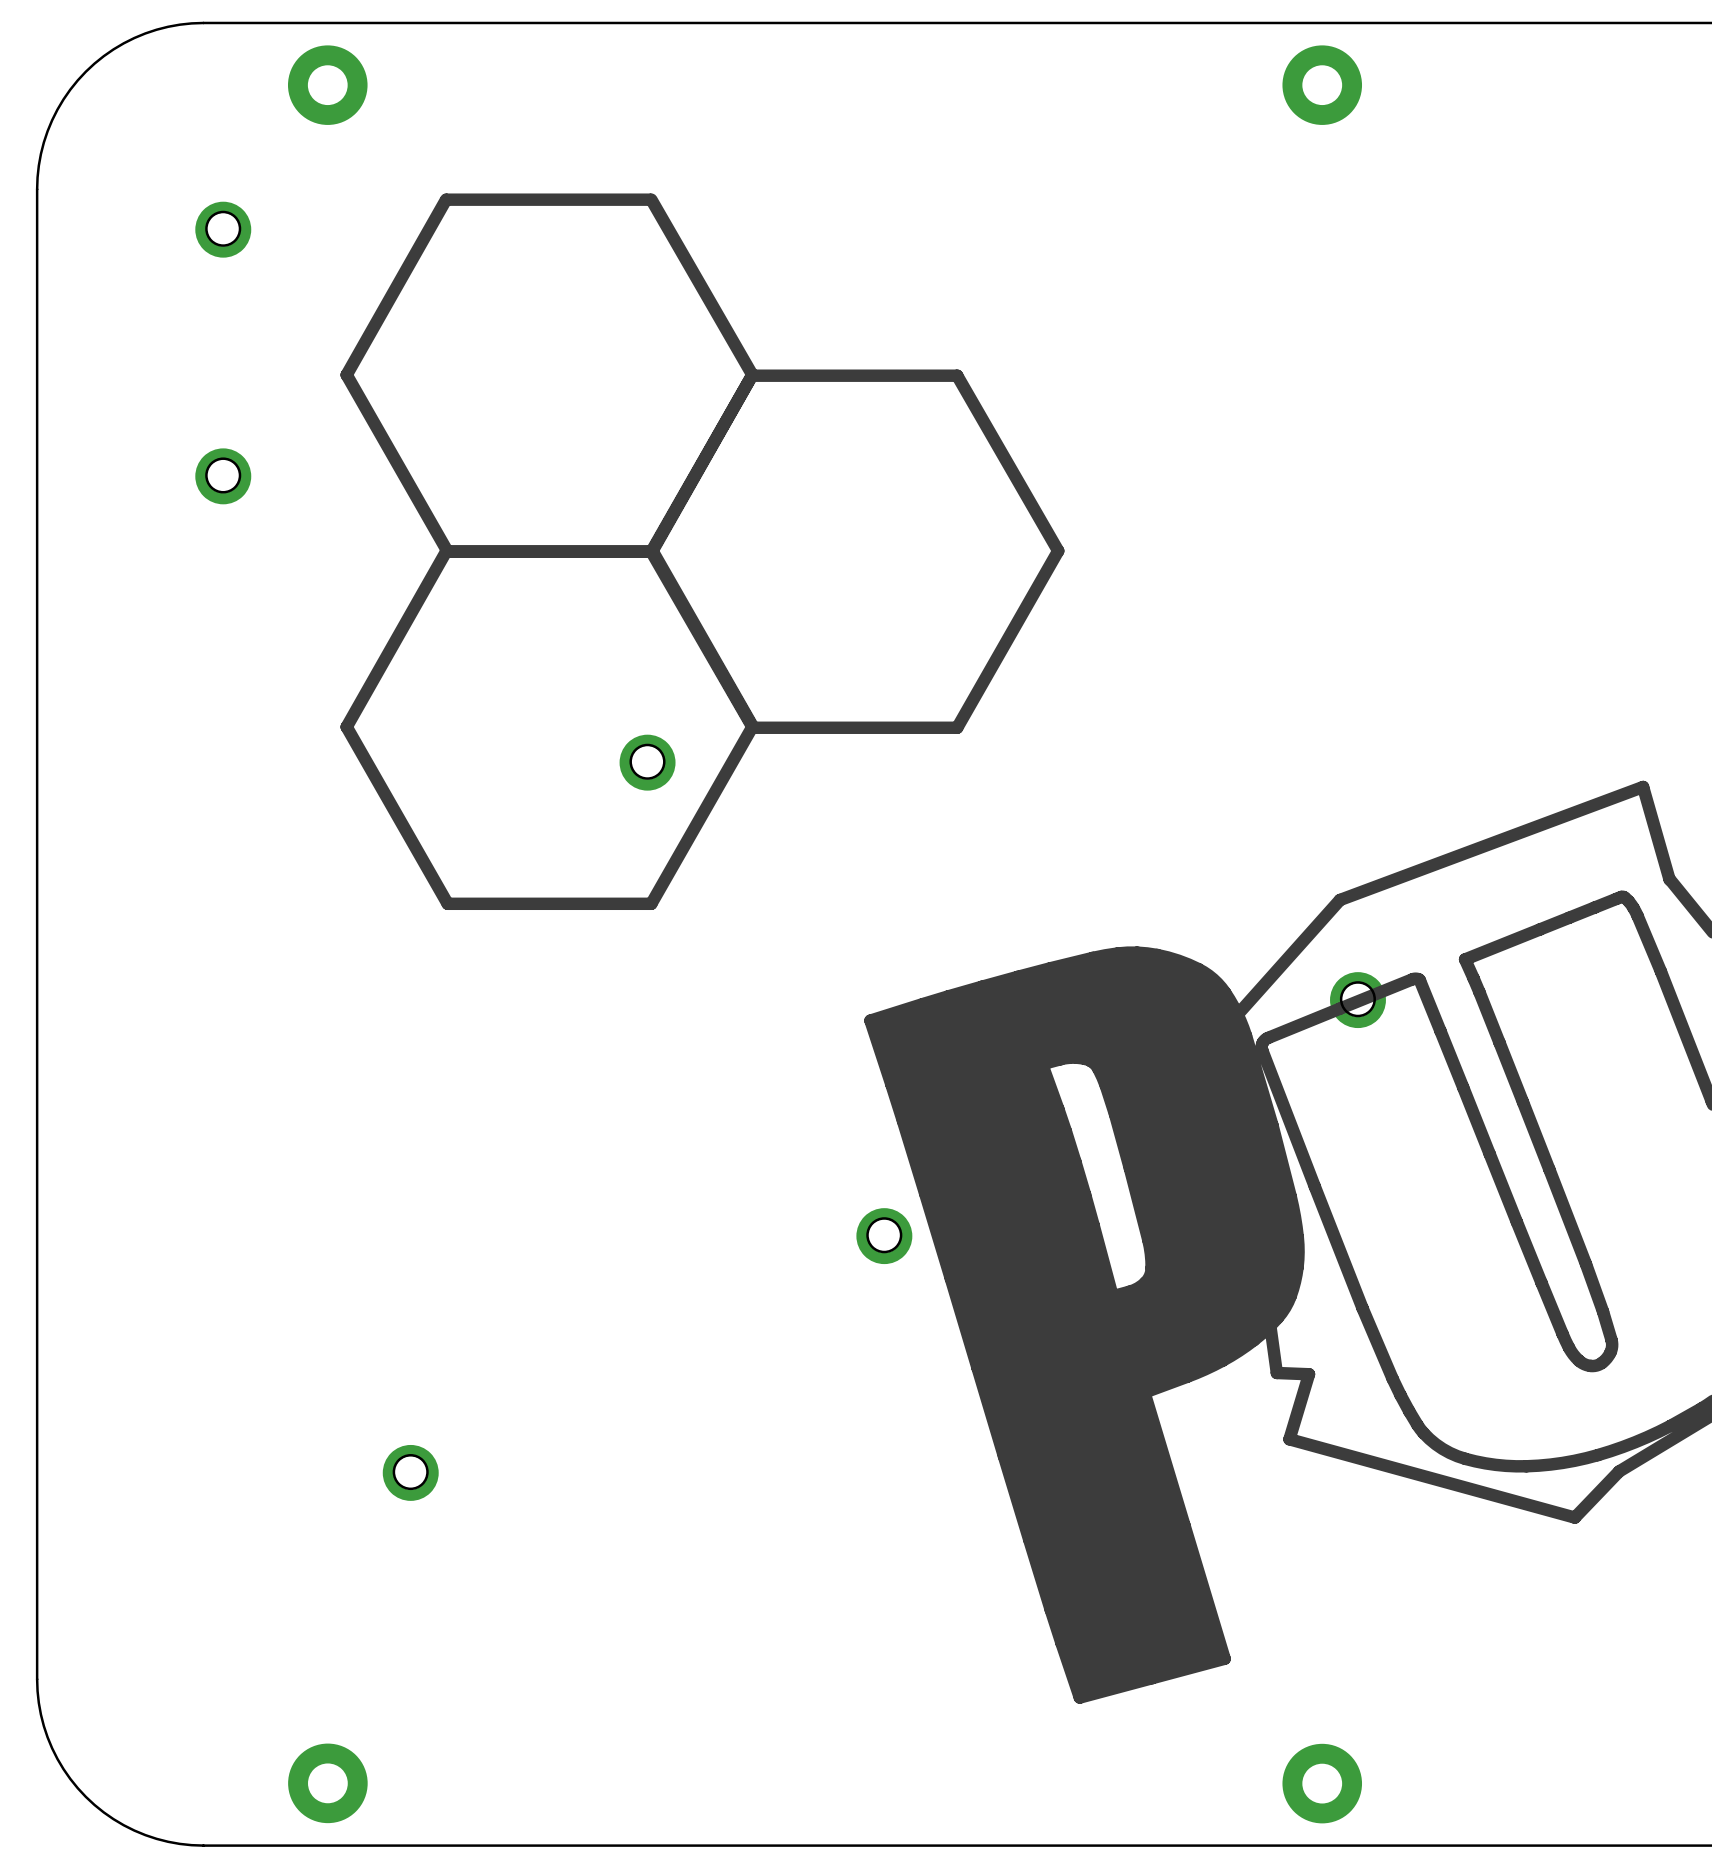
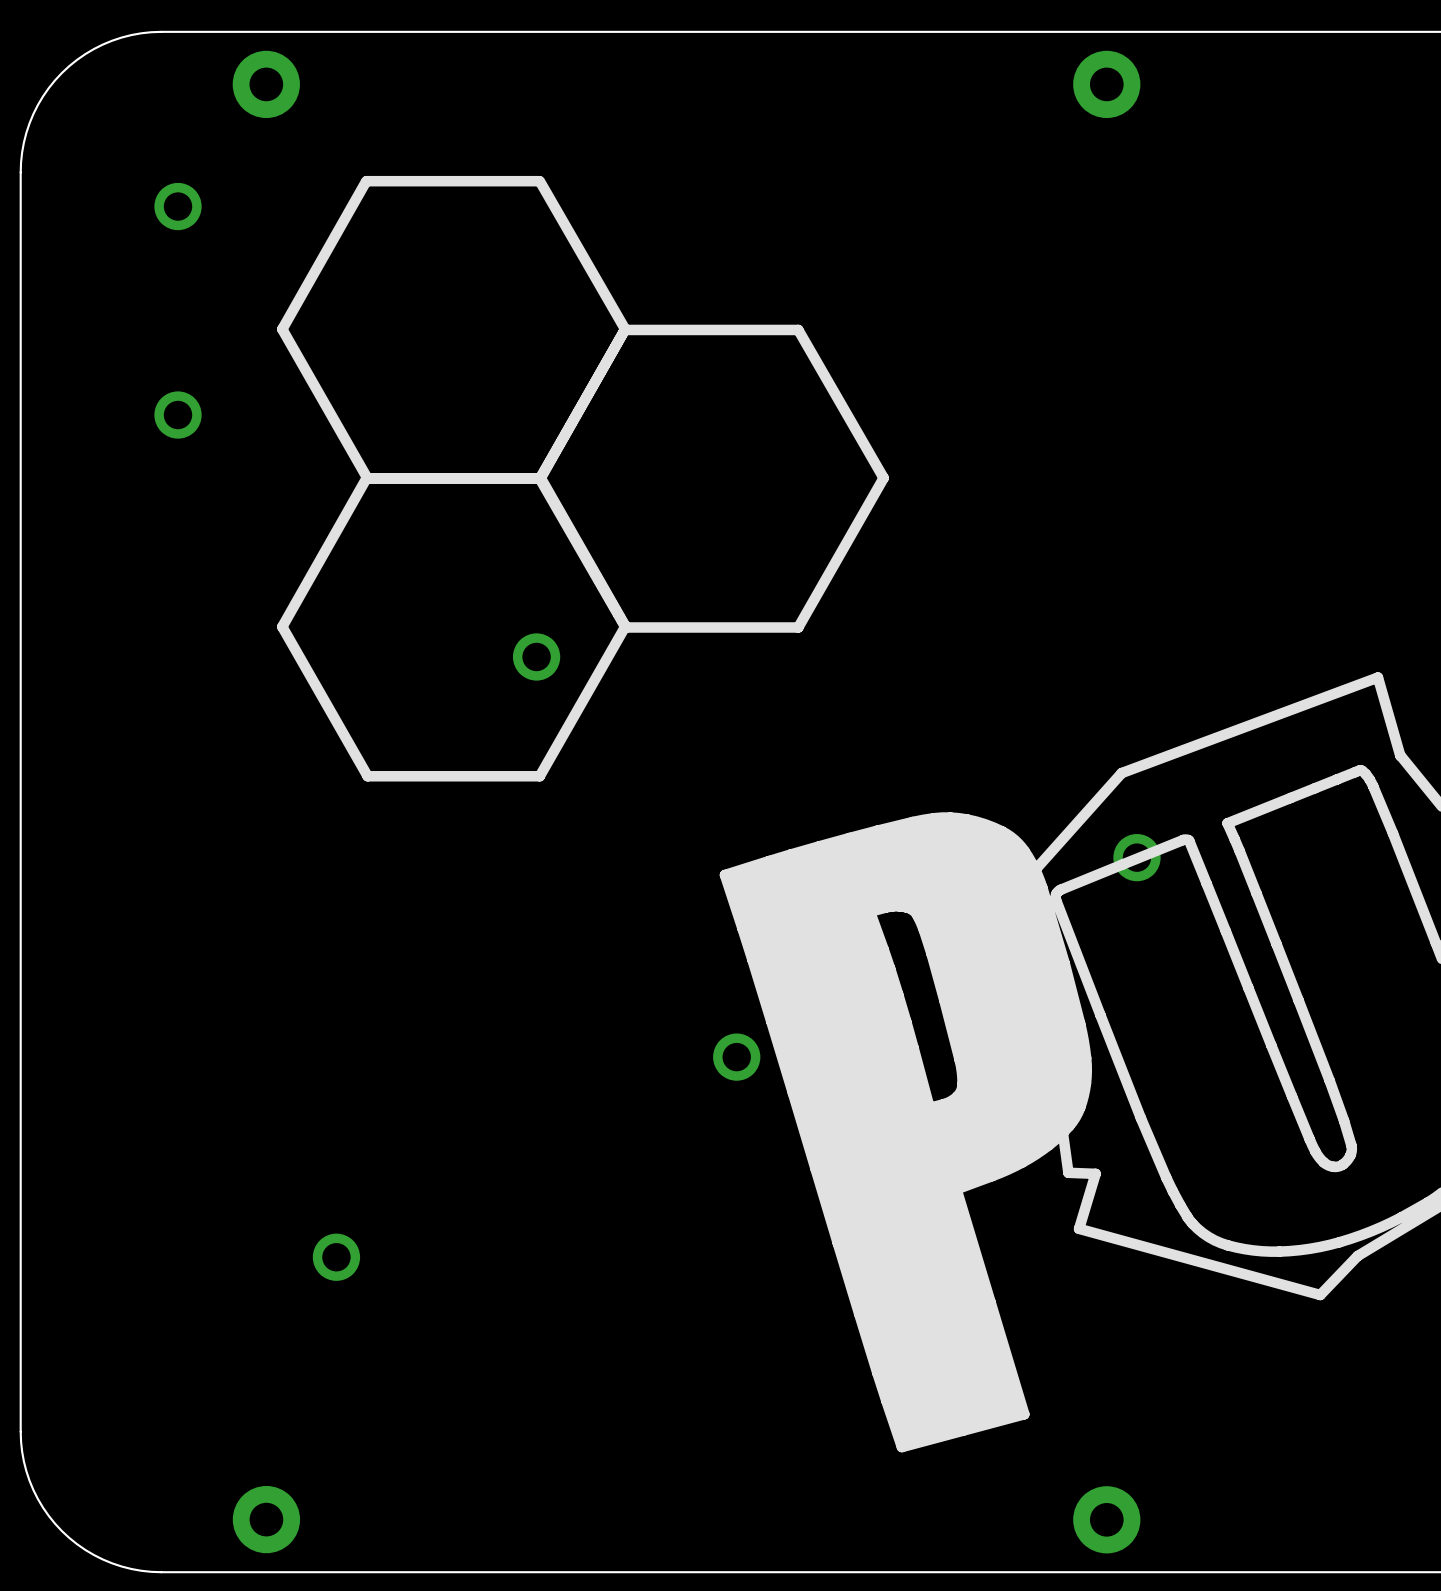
round board edge: [205, 210, 242, 247] -> none
round board edge: [205, 457, 242, 494] -> none
round board edge: [629, 743, 666, 780] -> none
round board edge: [1339, 981, 1376, 1018] -> none
round board edge: [866, 1217, 903, 1254] -> none
round board edge: [392, 1454, 429, 1491] -> none

